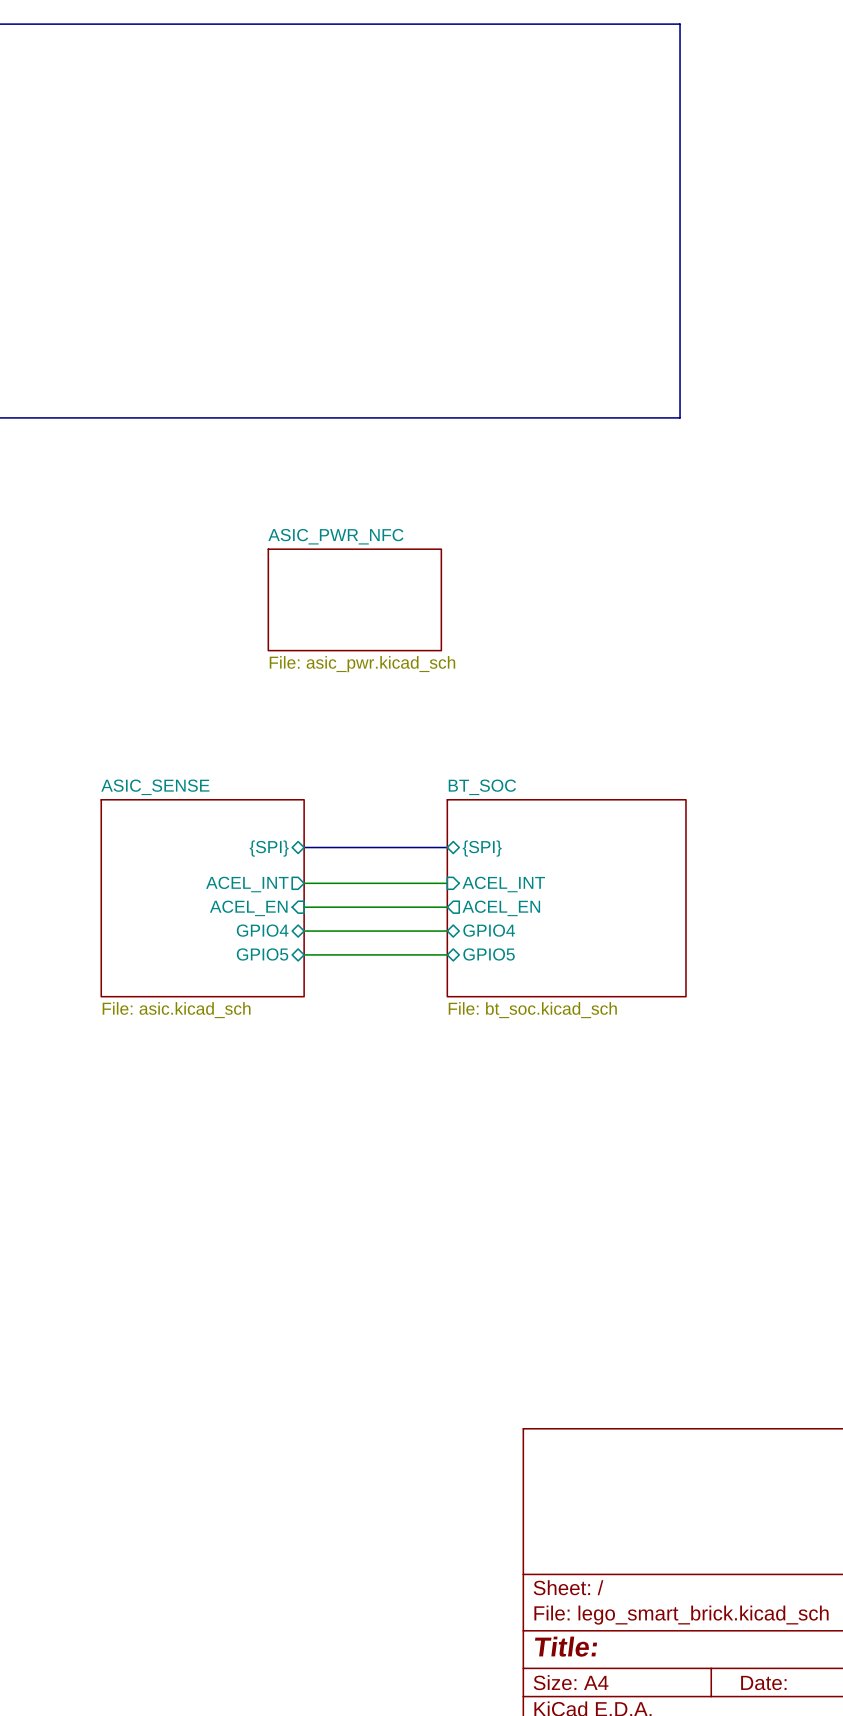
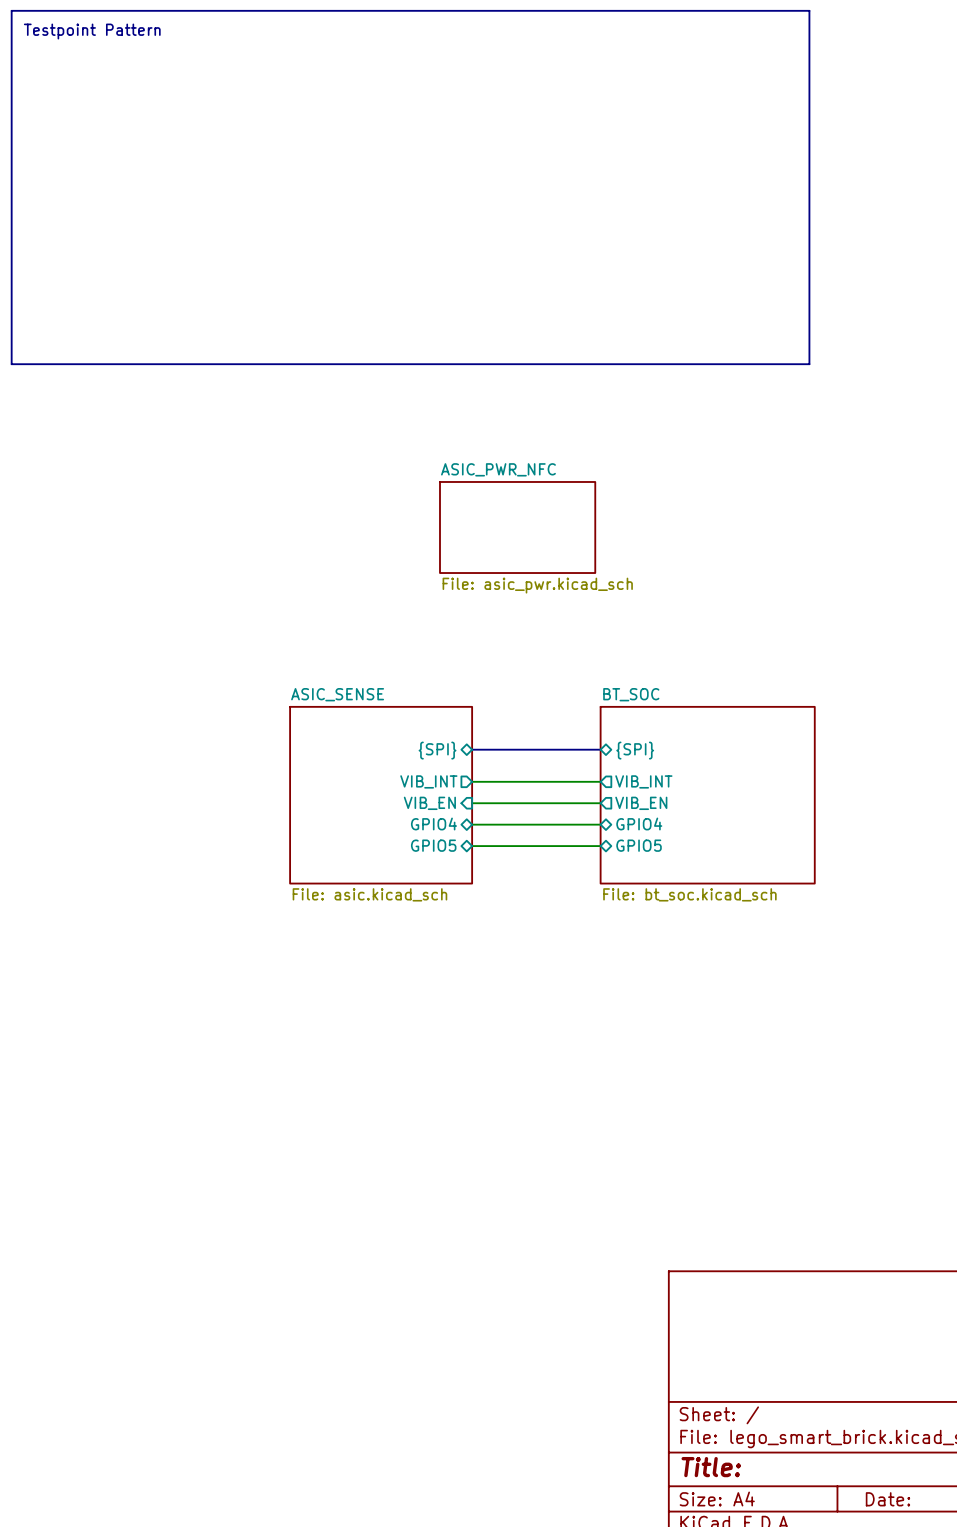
sheet pin: ACEL_INT (247, 884) -> VIB_INT (428, 781)
sheet pin shape: input (503, 884) -> output (643, 781)
sheet pin: ACEL_INT (503, 884) -> VIB_INT (643, 781)
sheet pin: ACEL_EN (248, 908) -> VIB_EN (429, 803)
sheet pin: ACEL_EN (501, 908) -> VIB_EN (641, 803)

